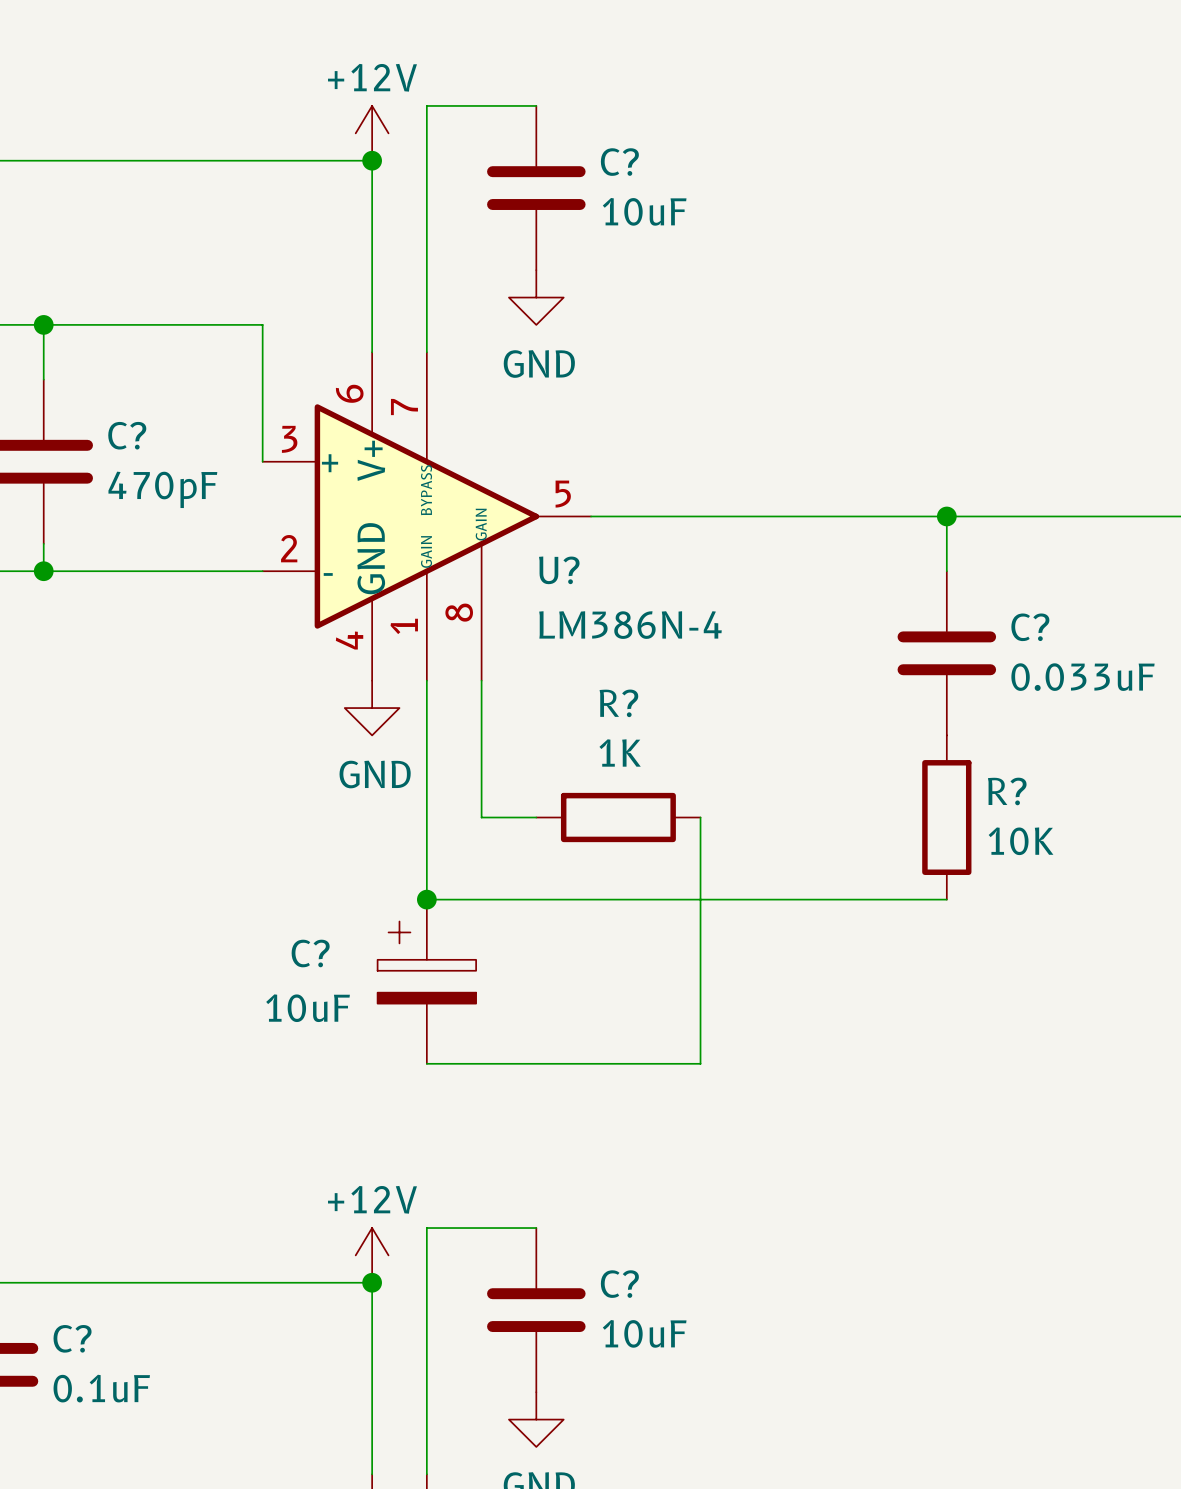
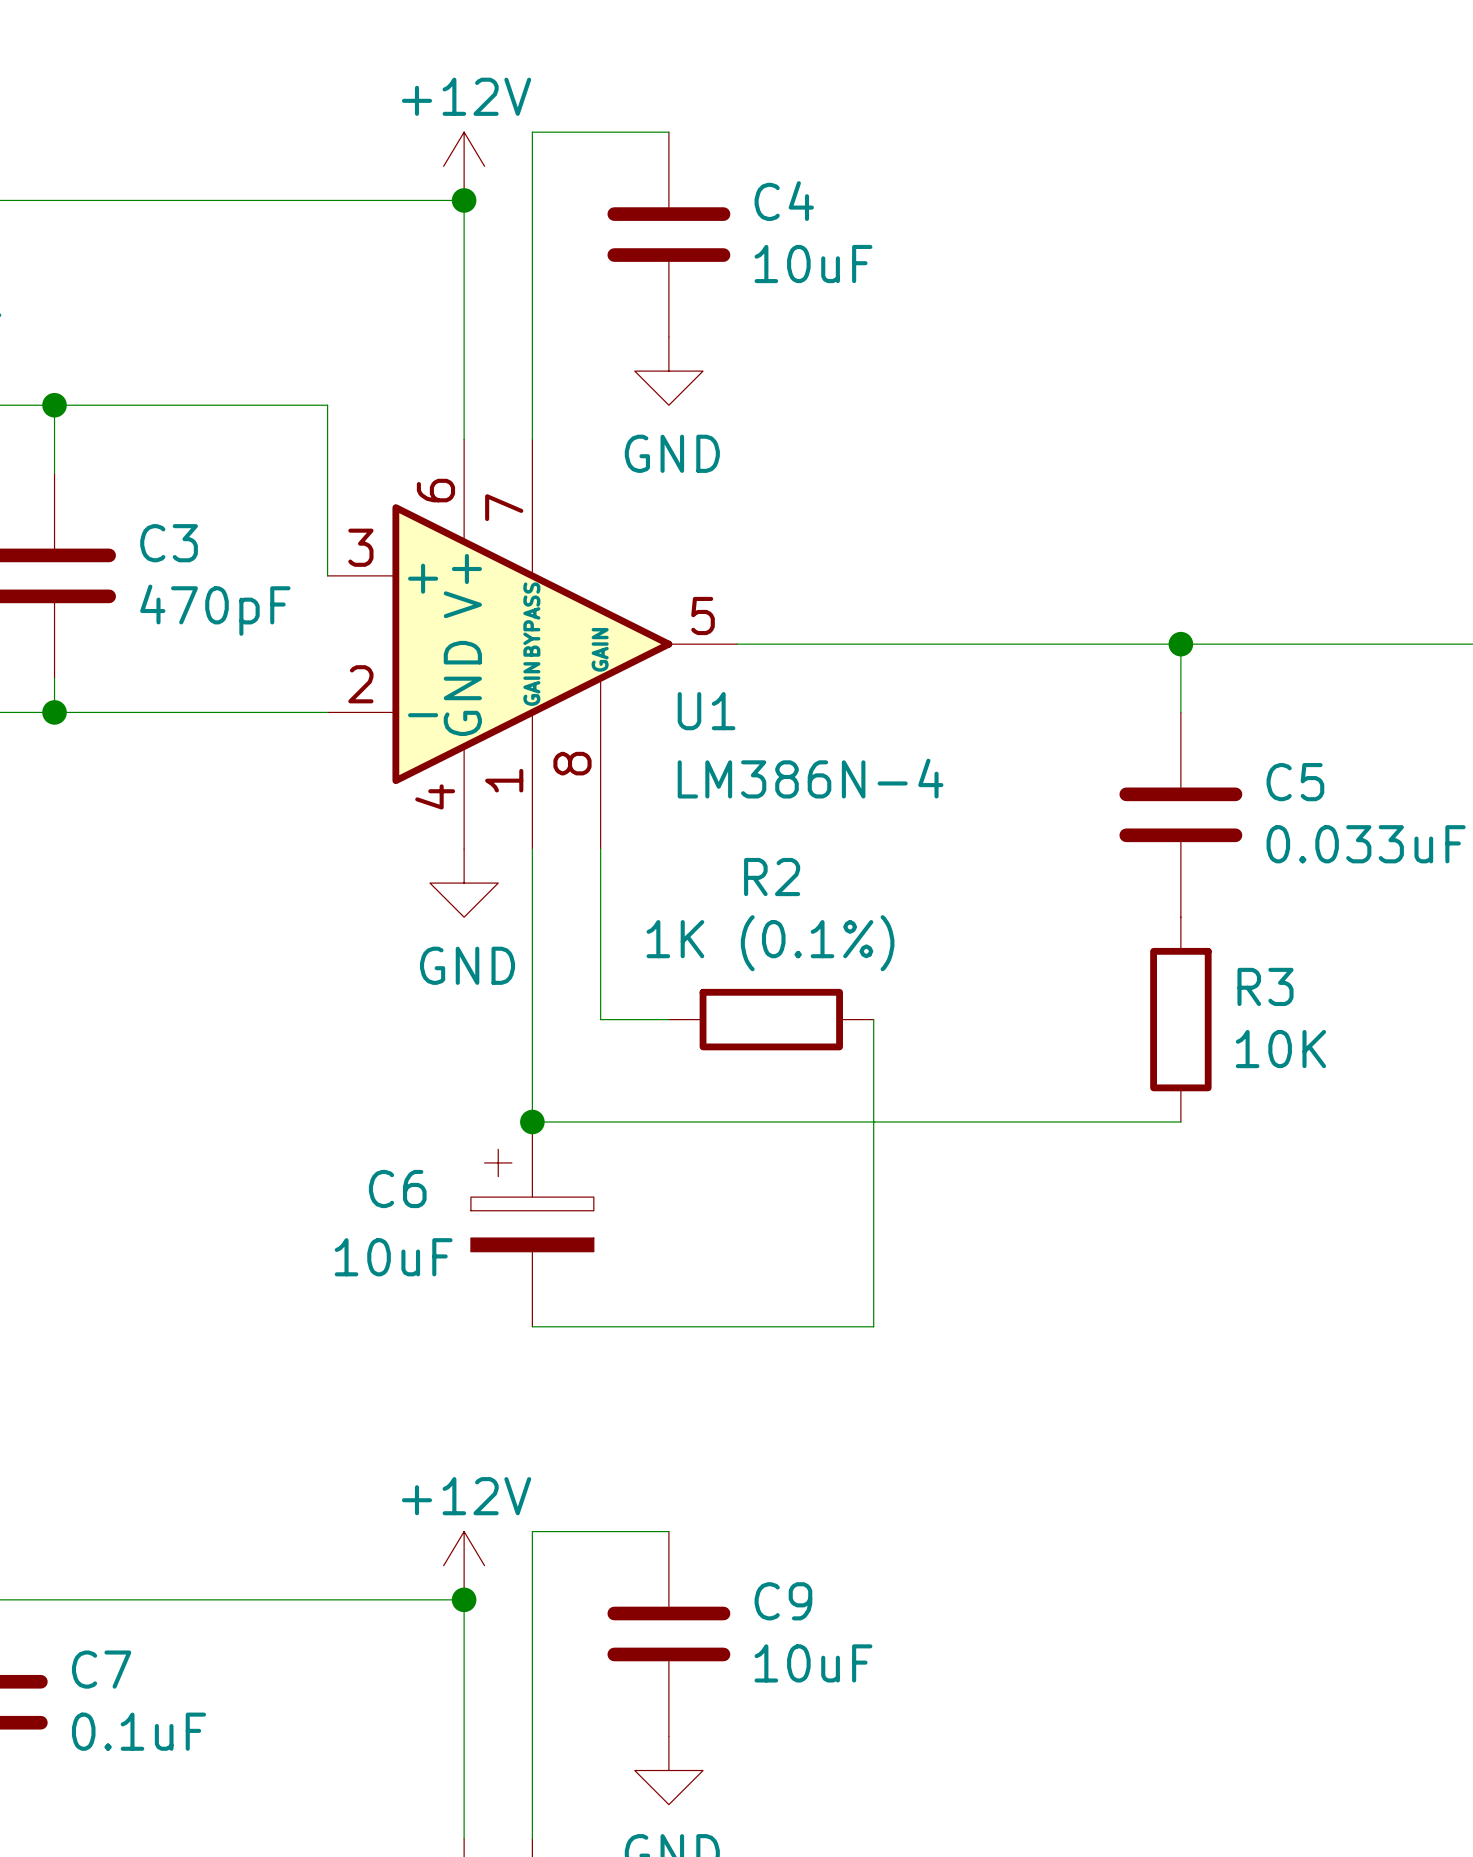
C? name: C? (619, 162) -> C4 (784, 201)
C? name: C? (127, 435) -> C3 (169, 543)
U? name: U? (559, 570) -> U1 (706, 711)
C? name: C? (1030, 627) -> C5 (1295, 782)
R? name: R? (618, 703) -> R2 (772, 877)
R? value: 1K (620, 753) -> 1K (0.1%) (770, 943)
R? name: R? (1007, 791) -> R3 (1265, 986)
C? name: C? (310, 953) -> C6 (397, 1188)
C? name: C? (619, 1284) -> C9 (783, 1601)
C? name: C? (72, 1338) -> C7 (101, 1669)

